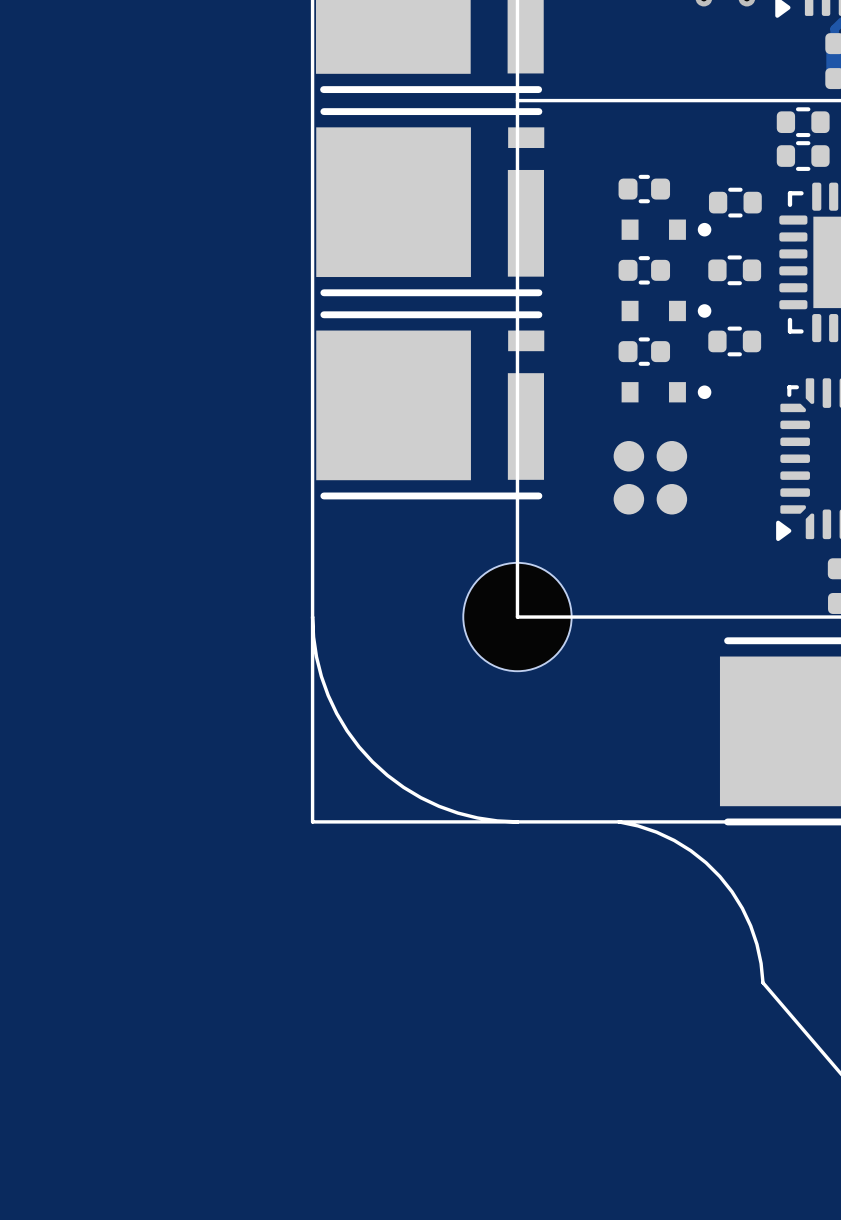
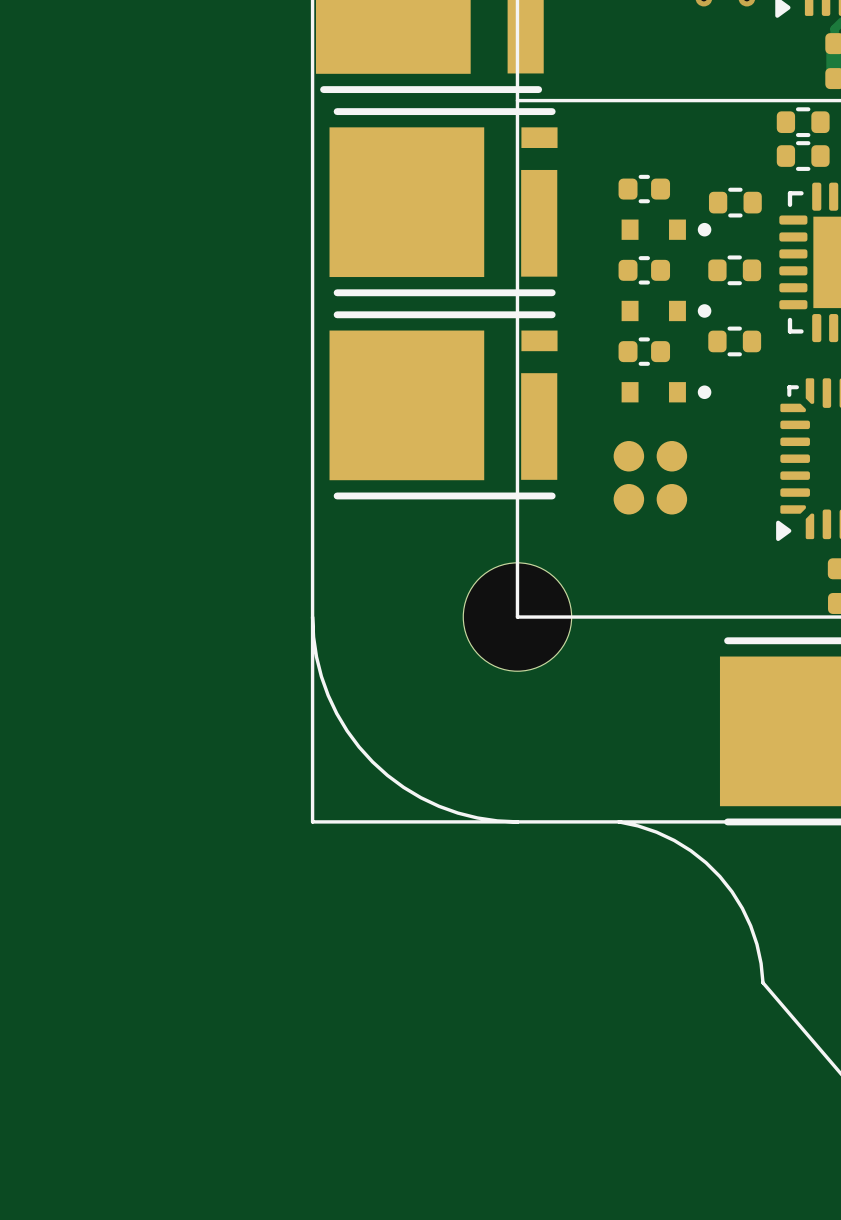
part position: (430, 202) -> (443, 202)
part position: (430, 405) -> (443, 405)

